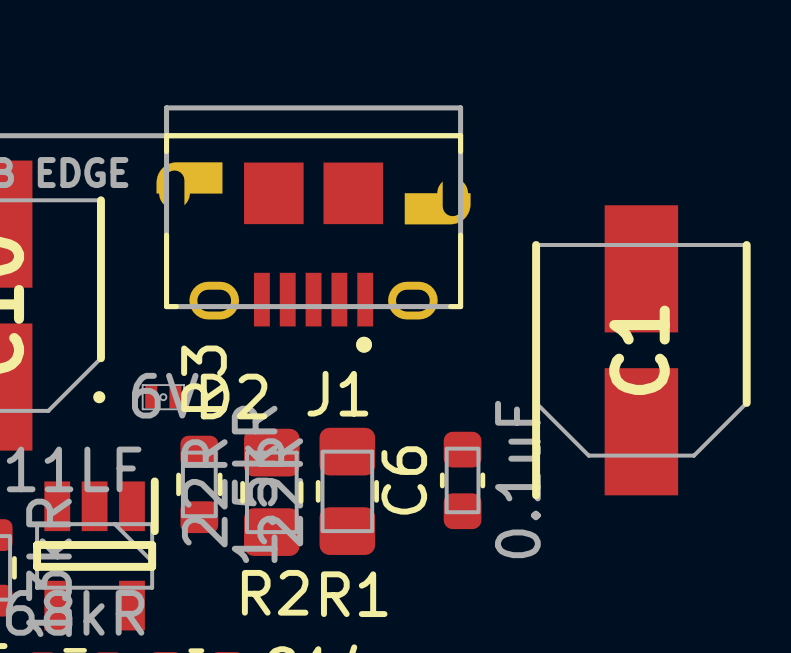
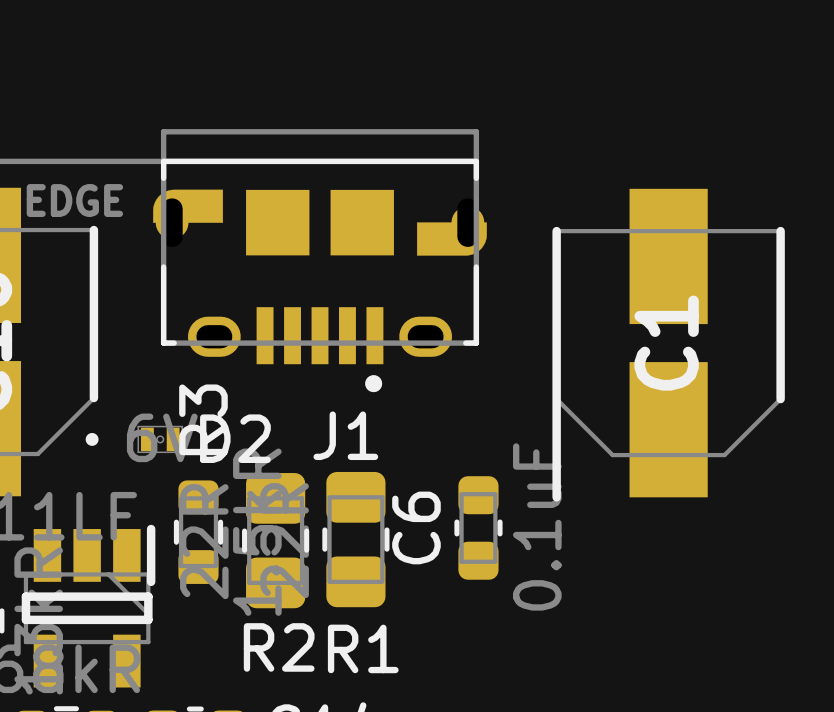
C1 position: (641, 352) -> (668, 345)

